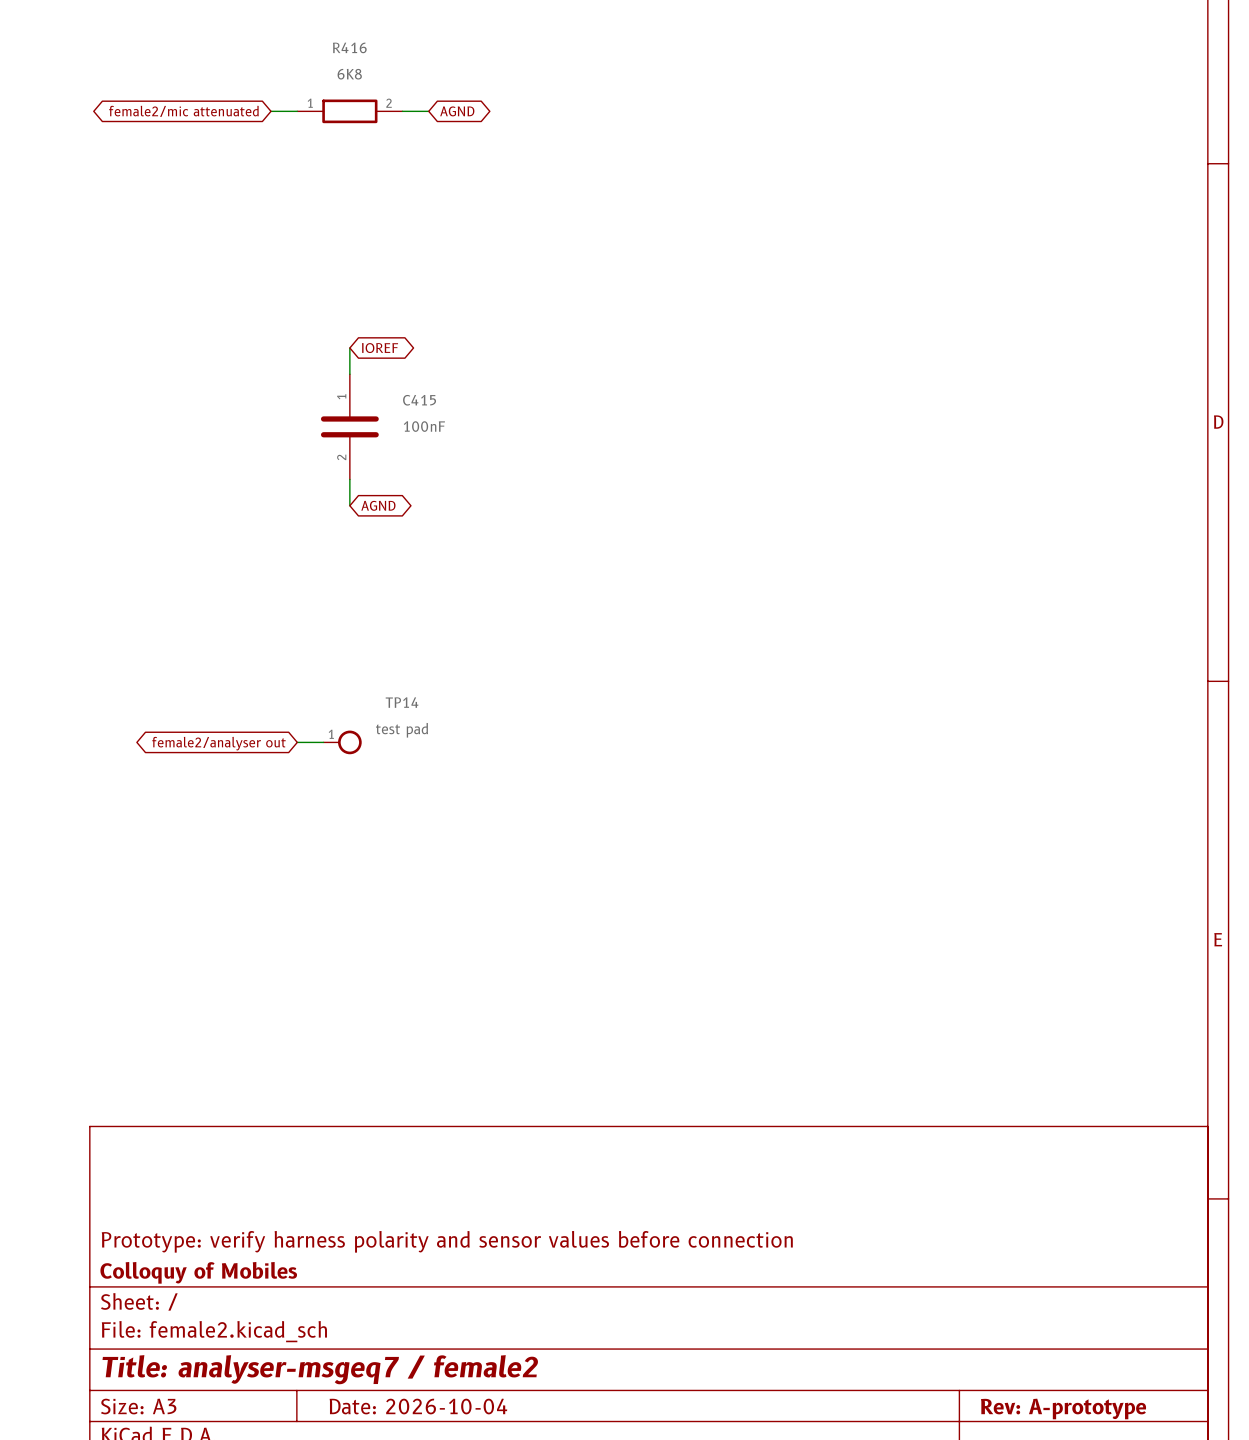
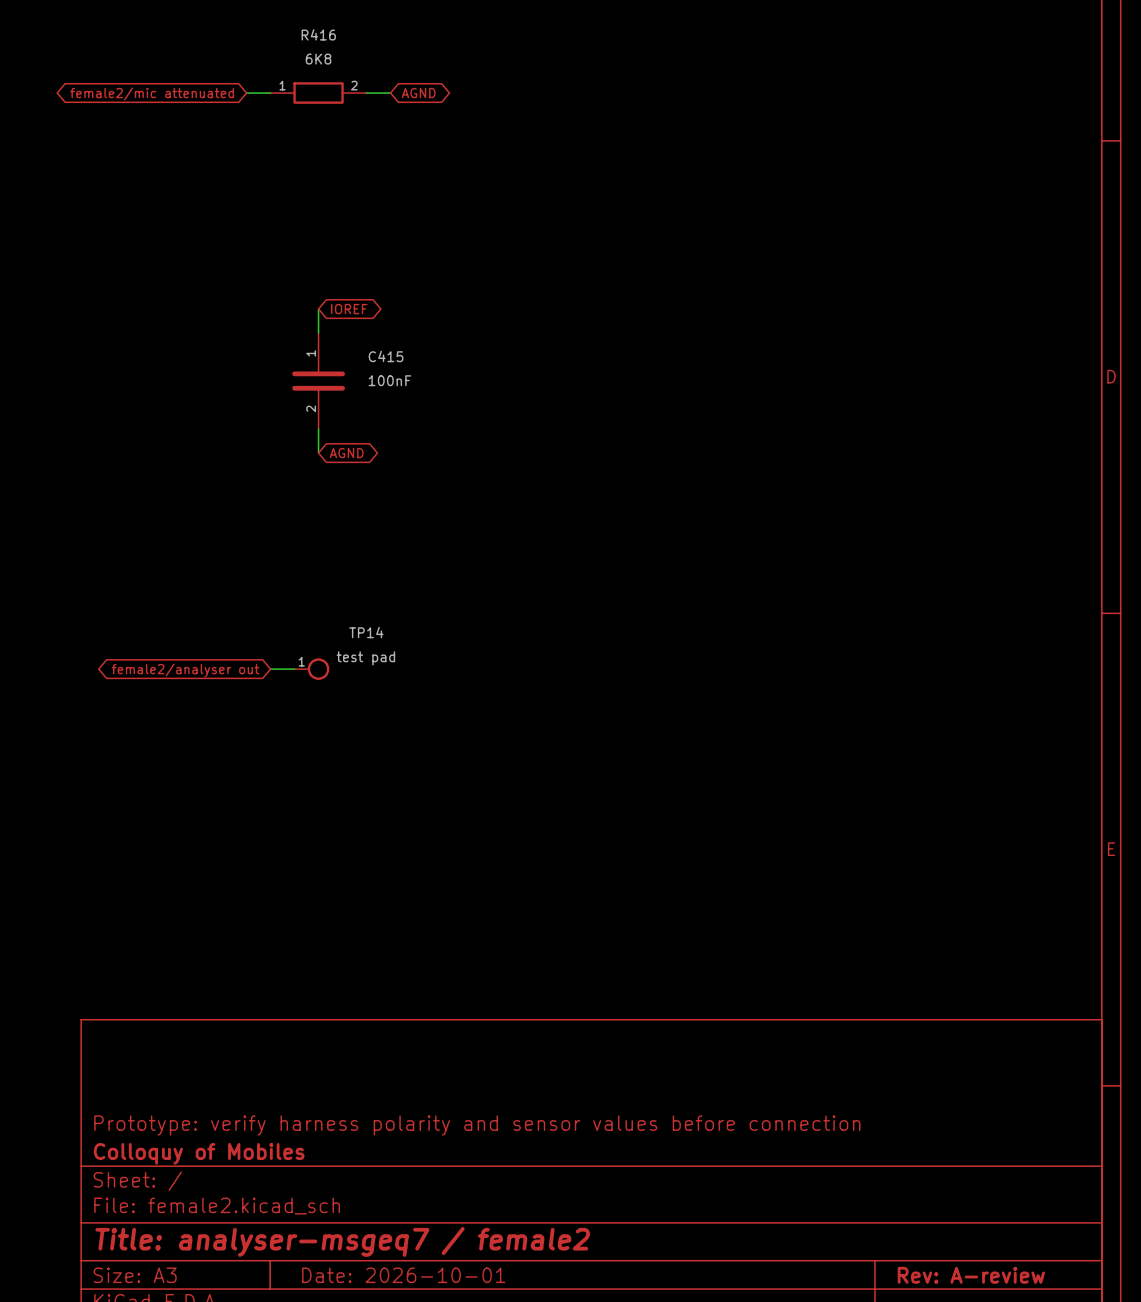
title block: Date: 2026-10-04 (418, 1406) -> Date: 2026-10-01 (403, 1275)
title block: Rev: A-prototype (1063, 1408) -> Rev: A-review (971, 1275)

